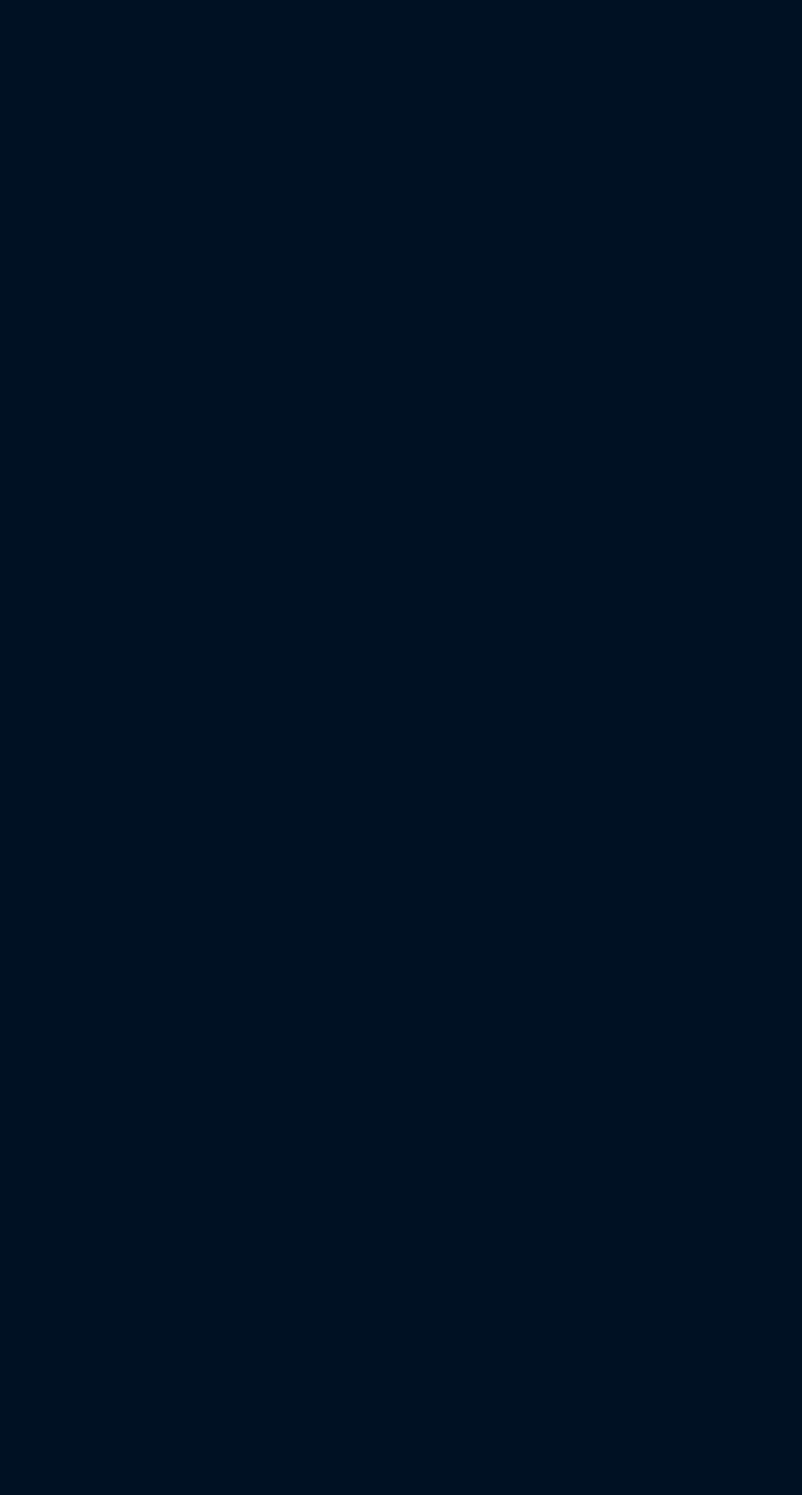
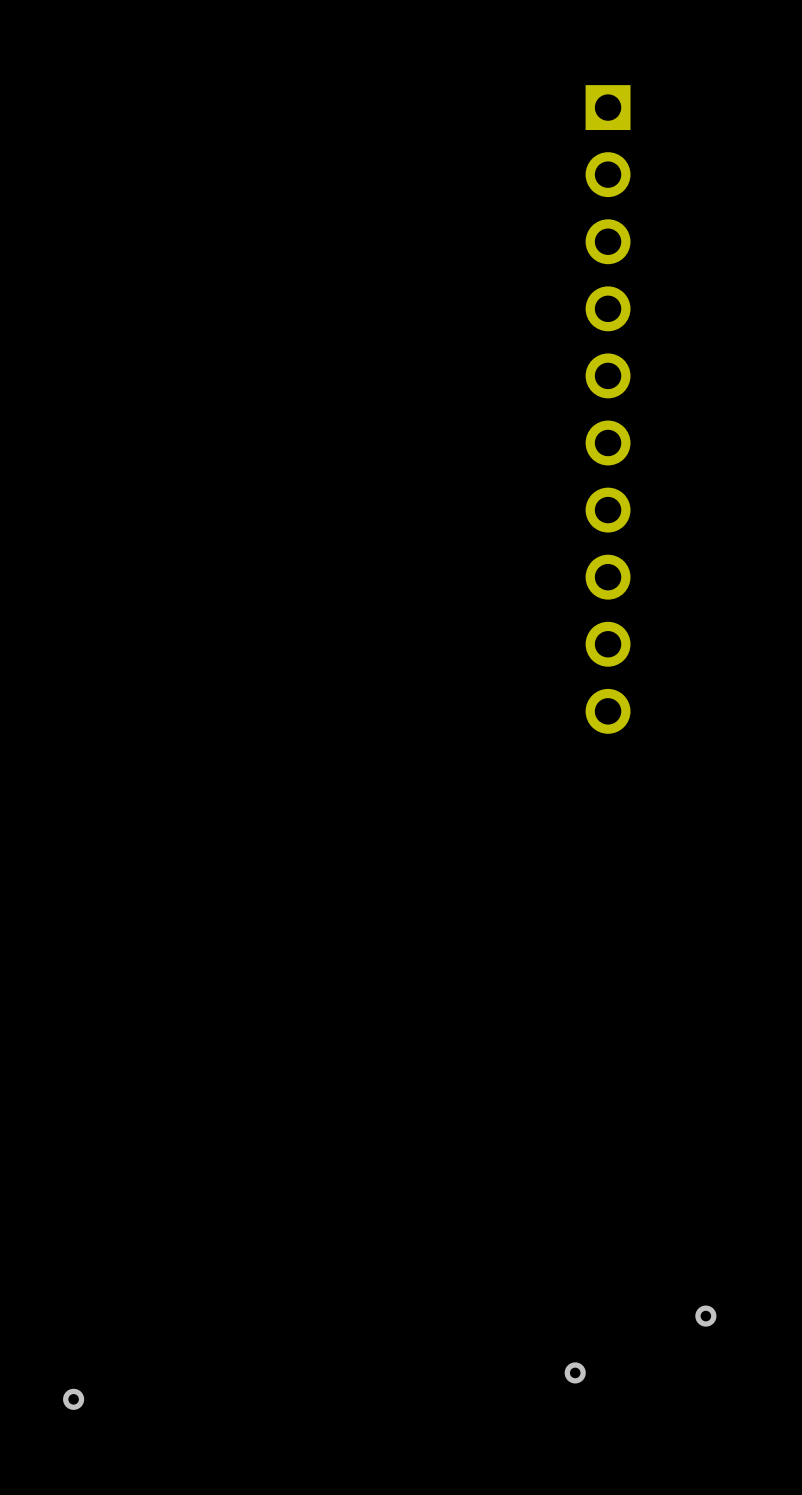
part: none -> (608, 409)
via: none -> (705, 1316)
via: none -> (575, 1372)
via: none -> (73, 1399)

